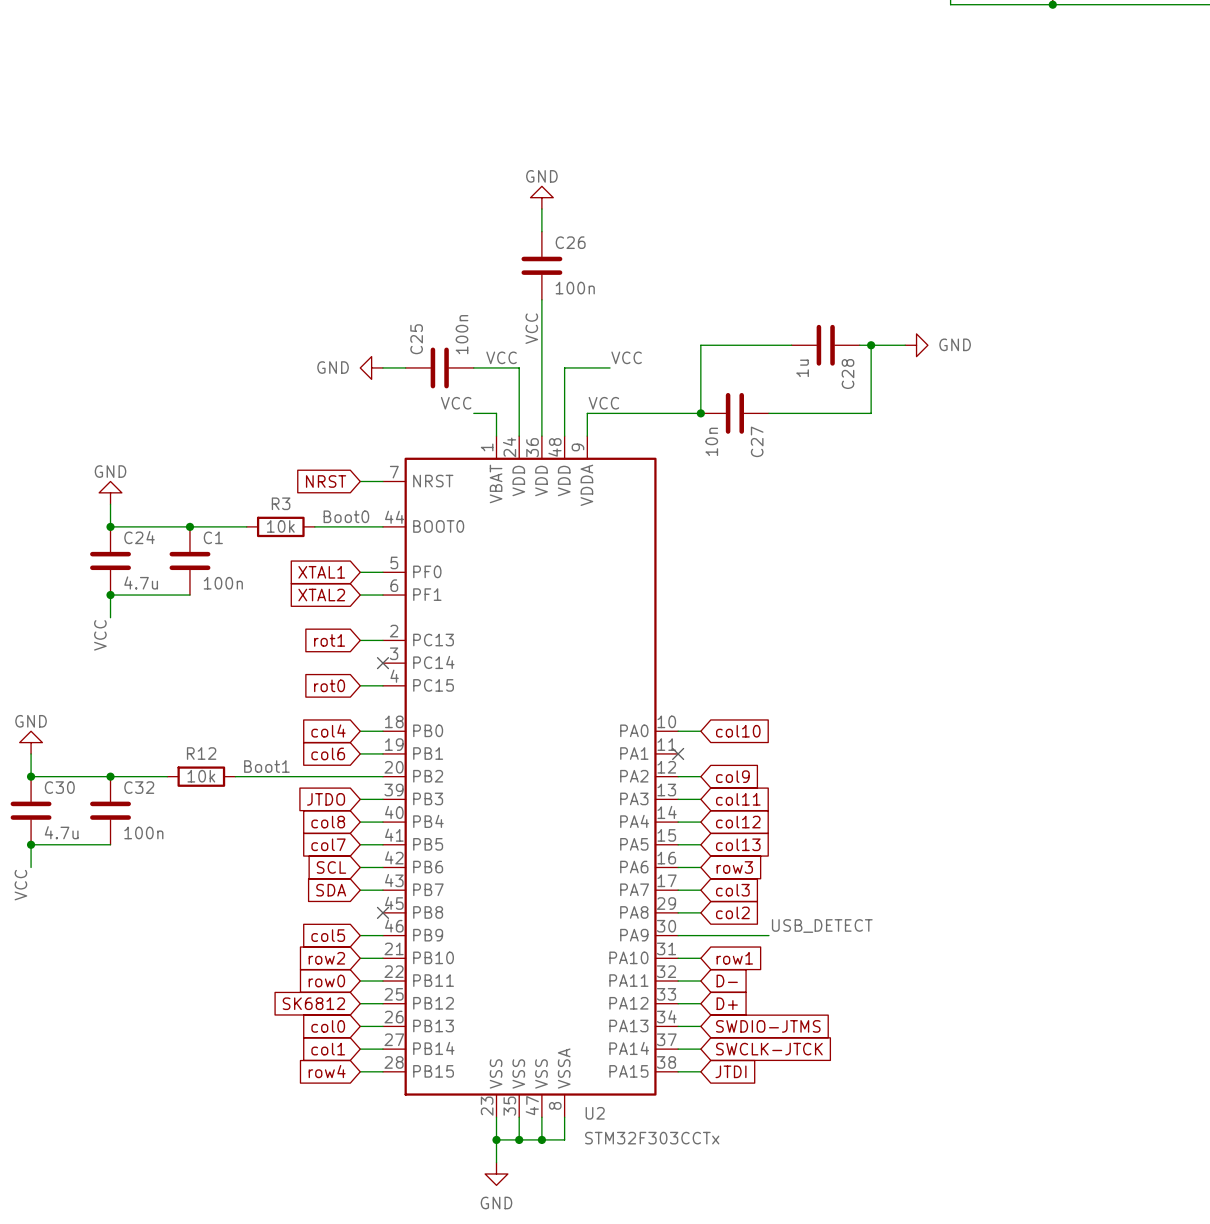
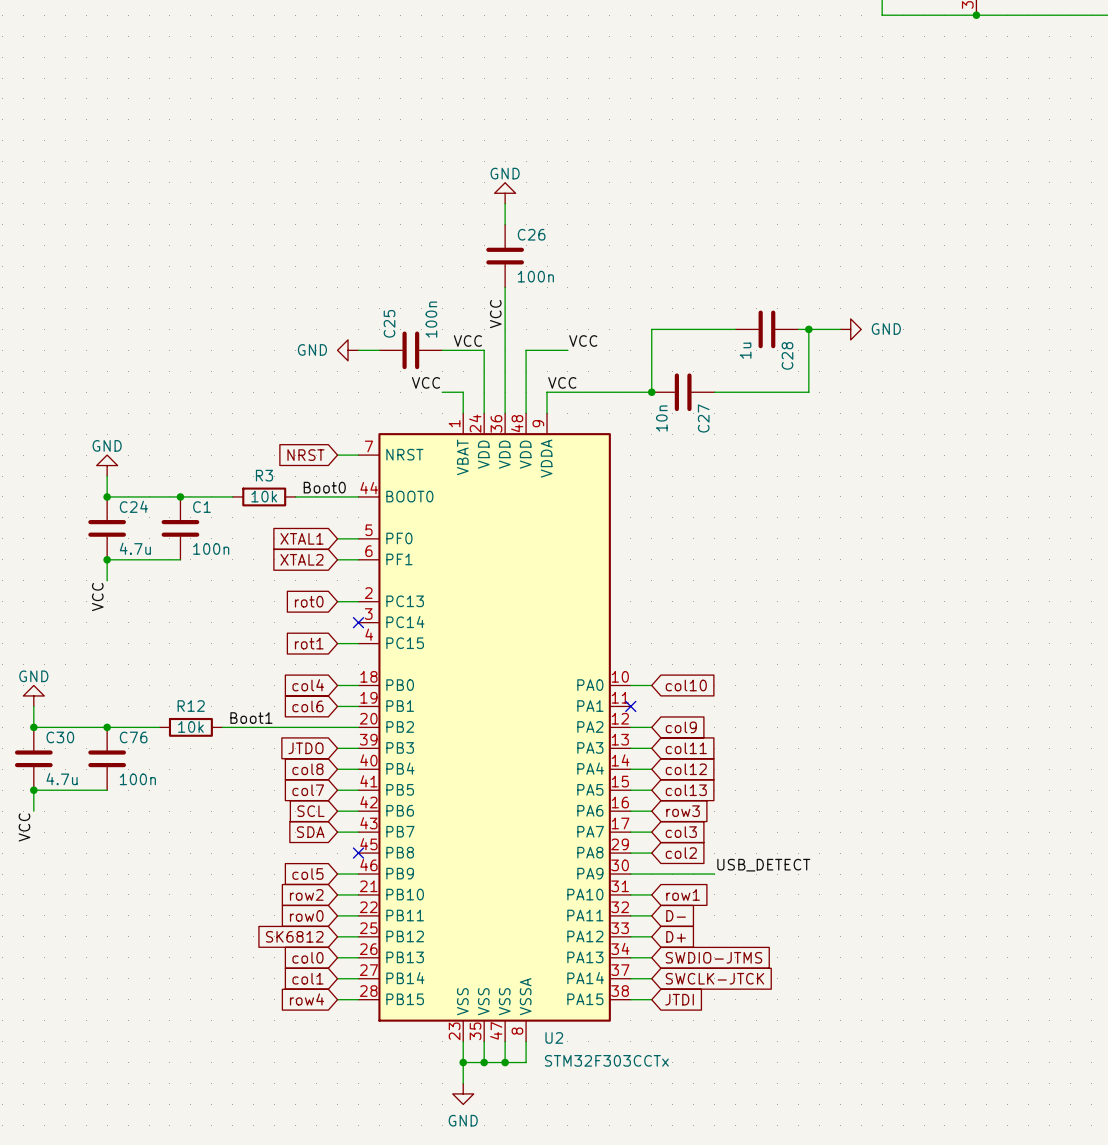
global label: rot1 (329, 640) -> rot0 (309, 601)
global label: rot0 (329, 685) -> rot1 (309, 643)
C32 name: C32 (139, 787) -> C76 (133, 737)

